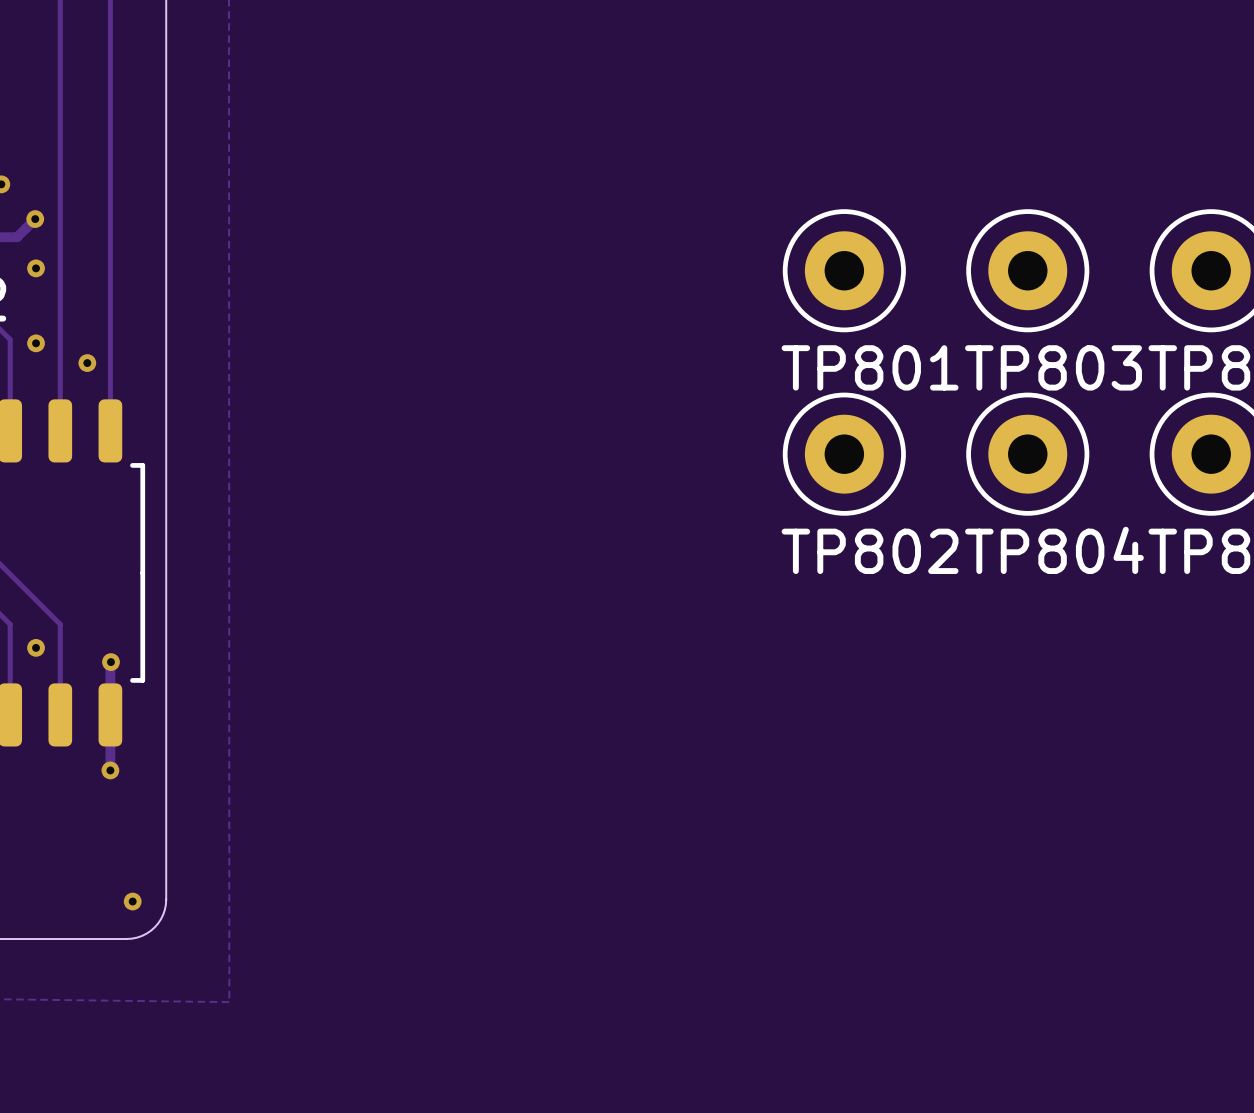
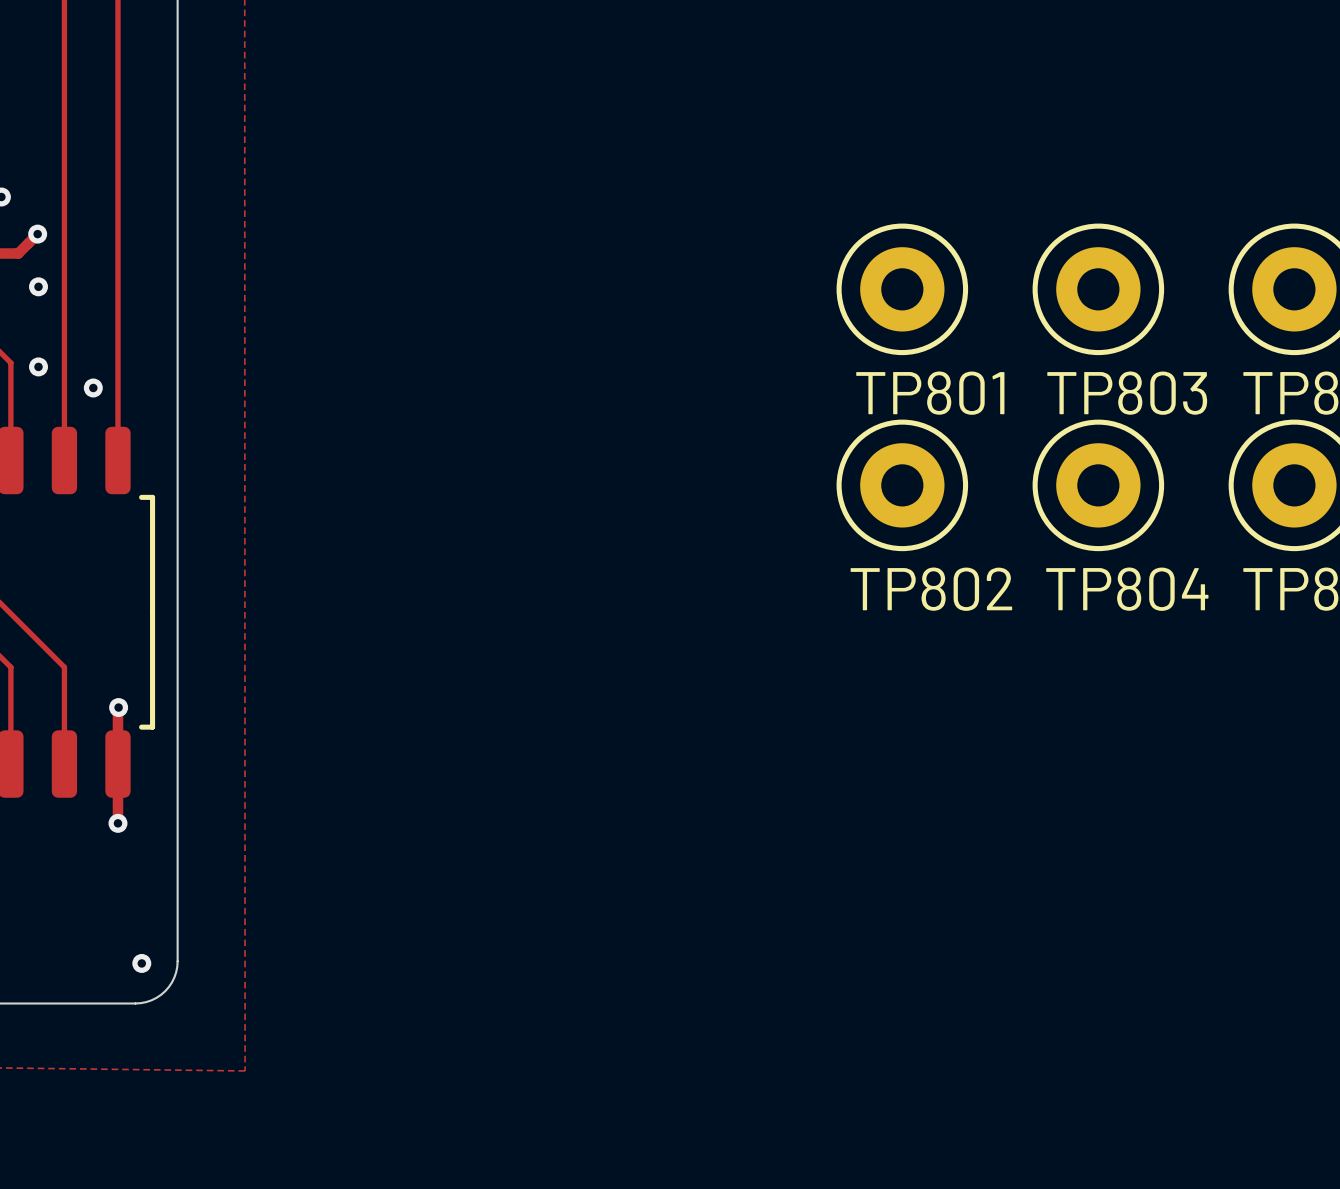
via: (36, 647) -> none

